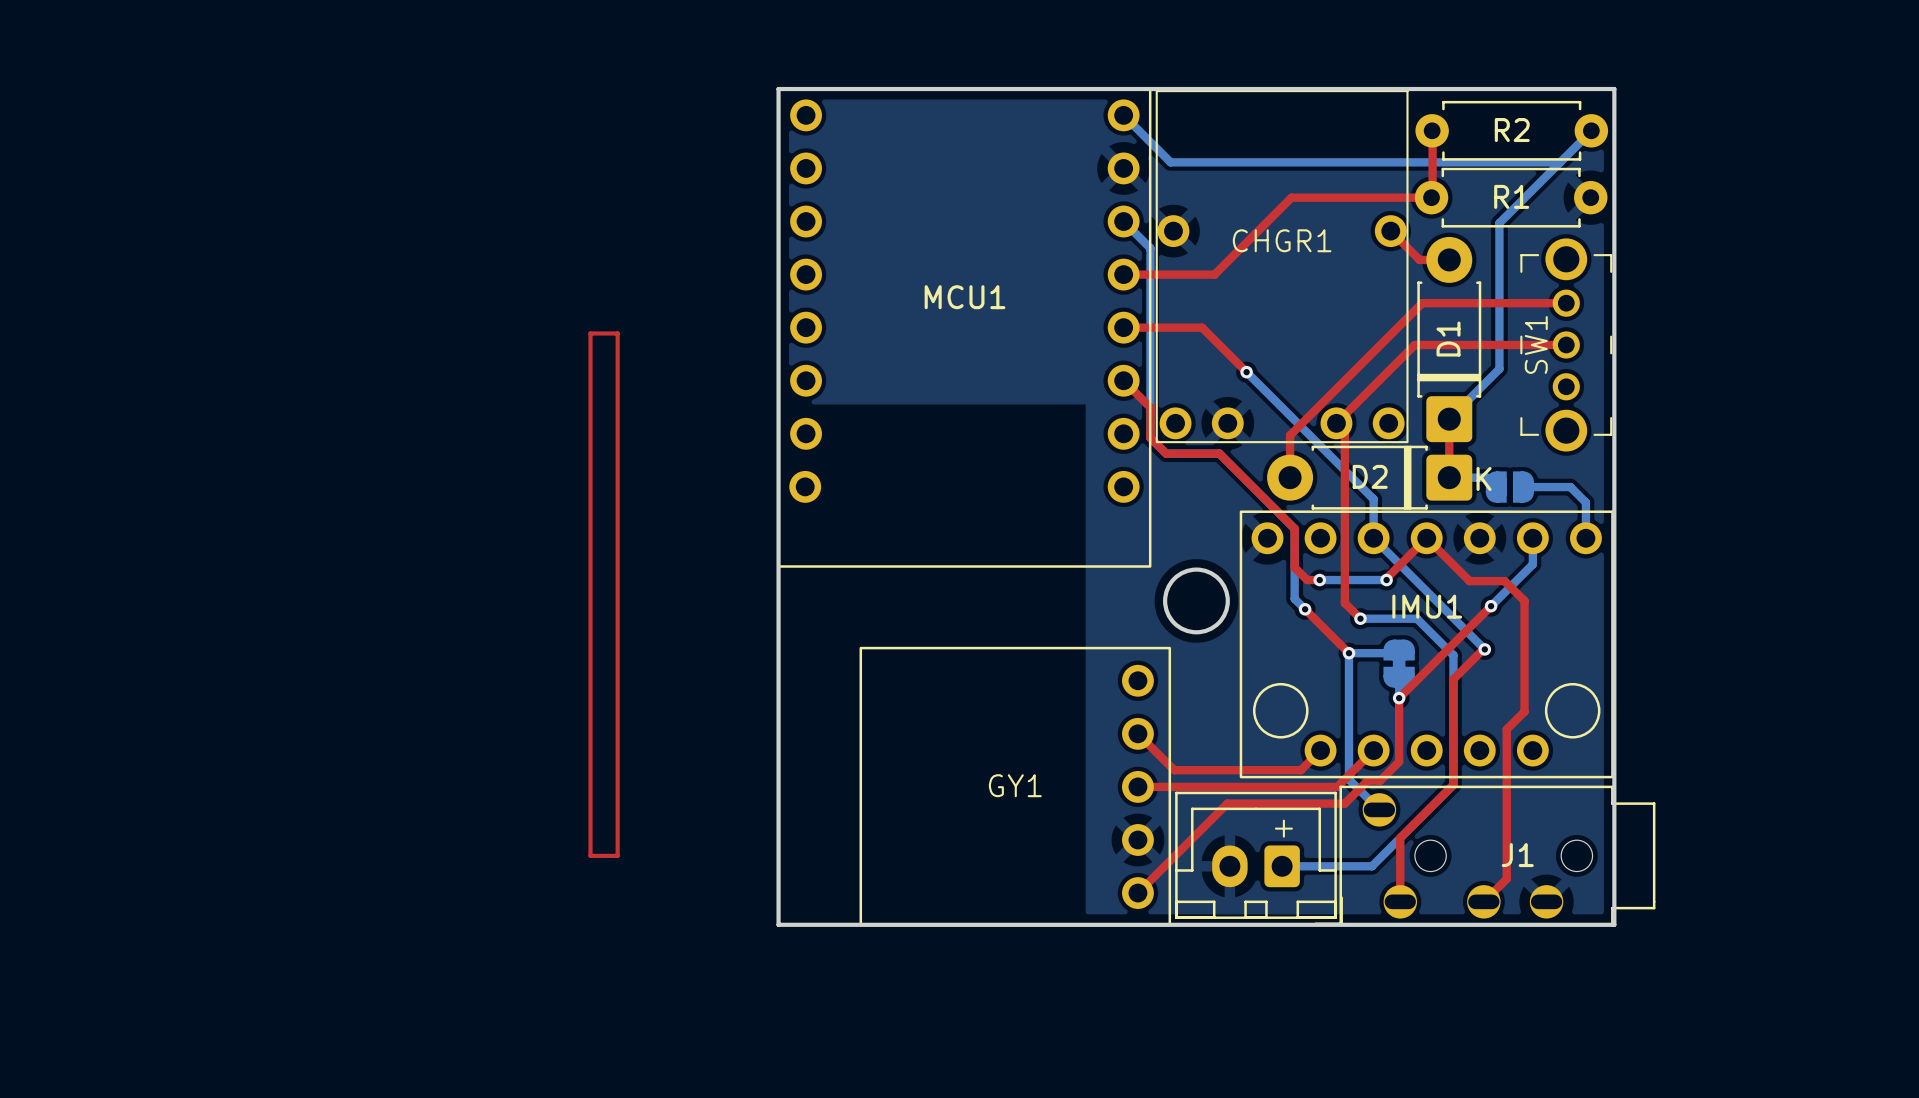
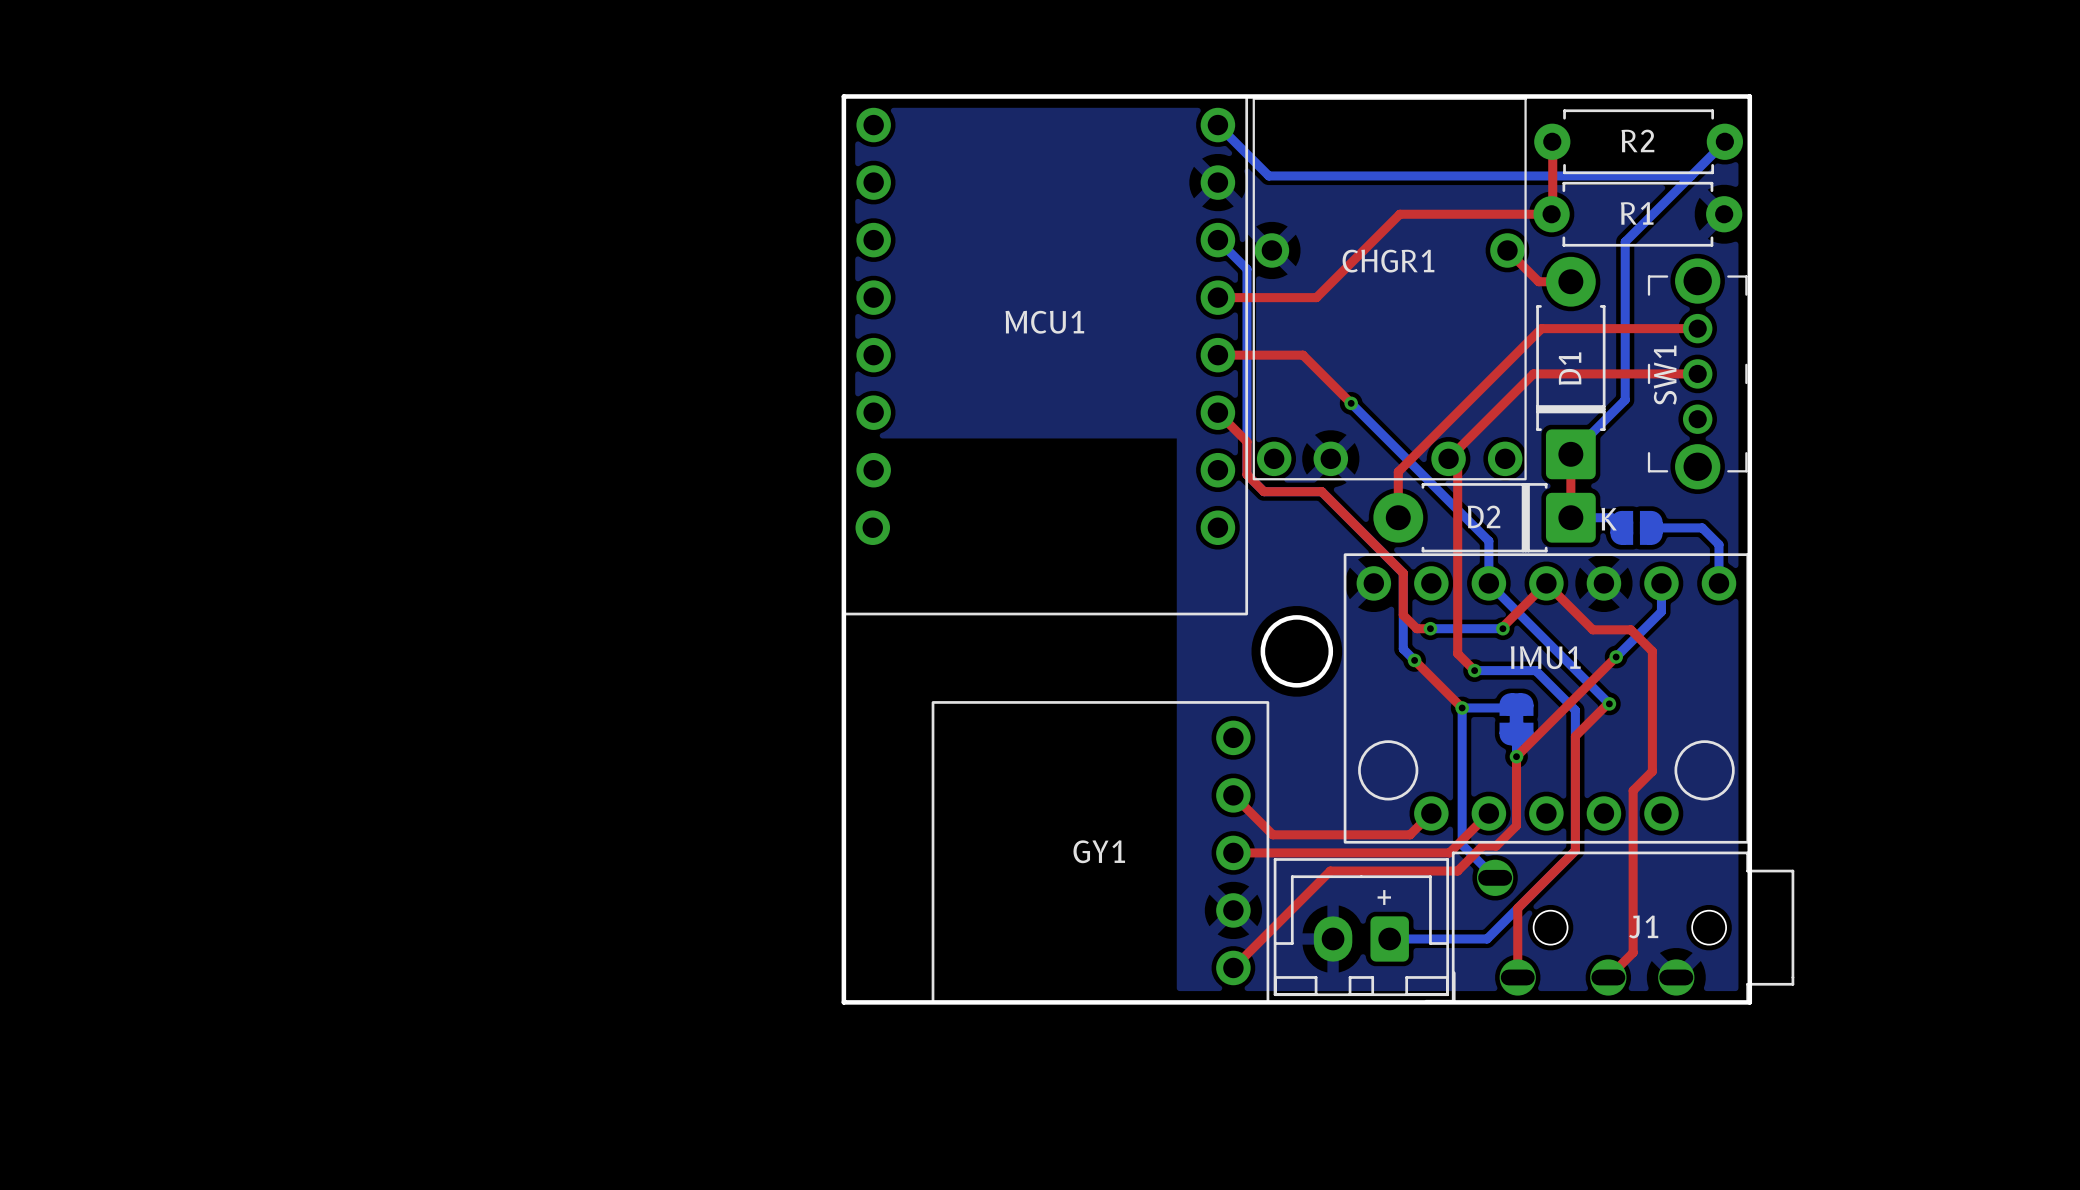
top track: (590, 333) (617, 333) (617, 855) (590, 855) (590, 333) -> none

